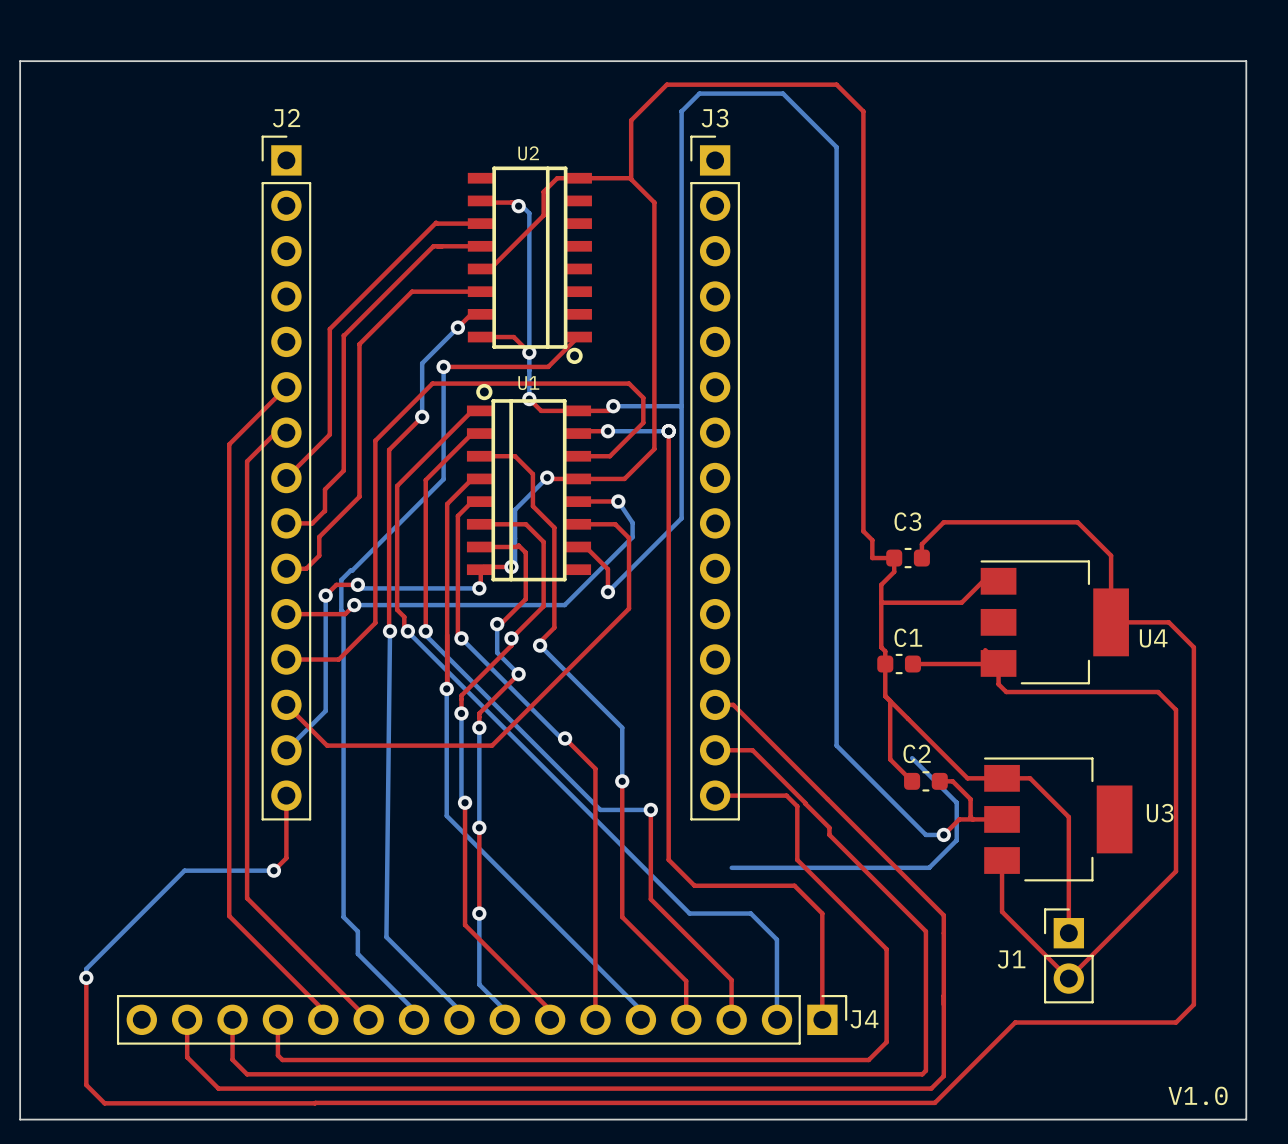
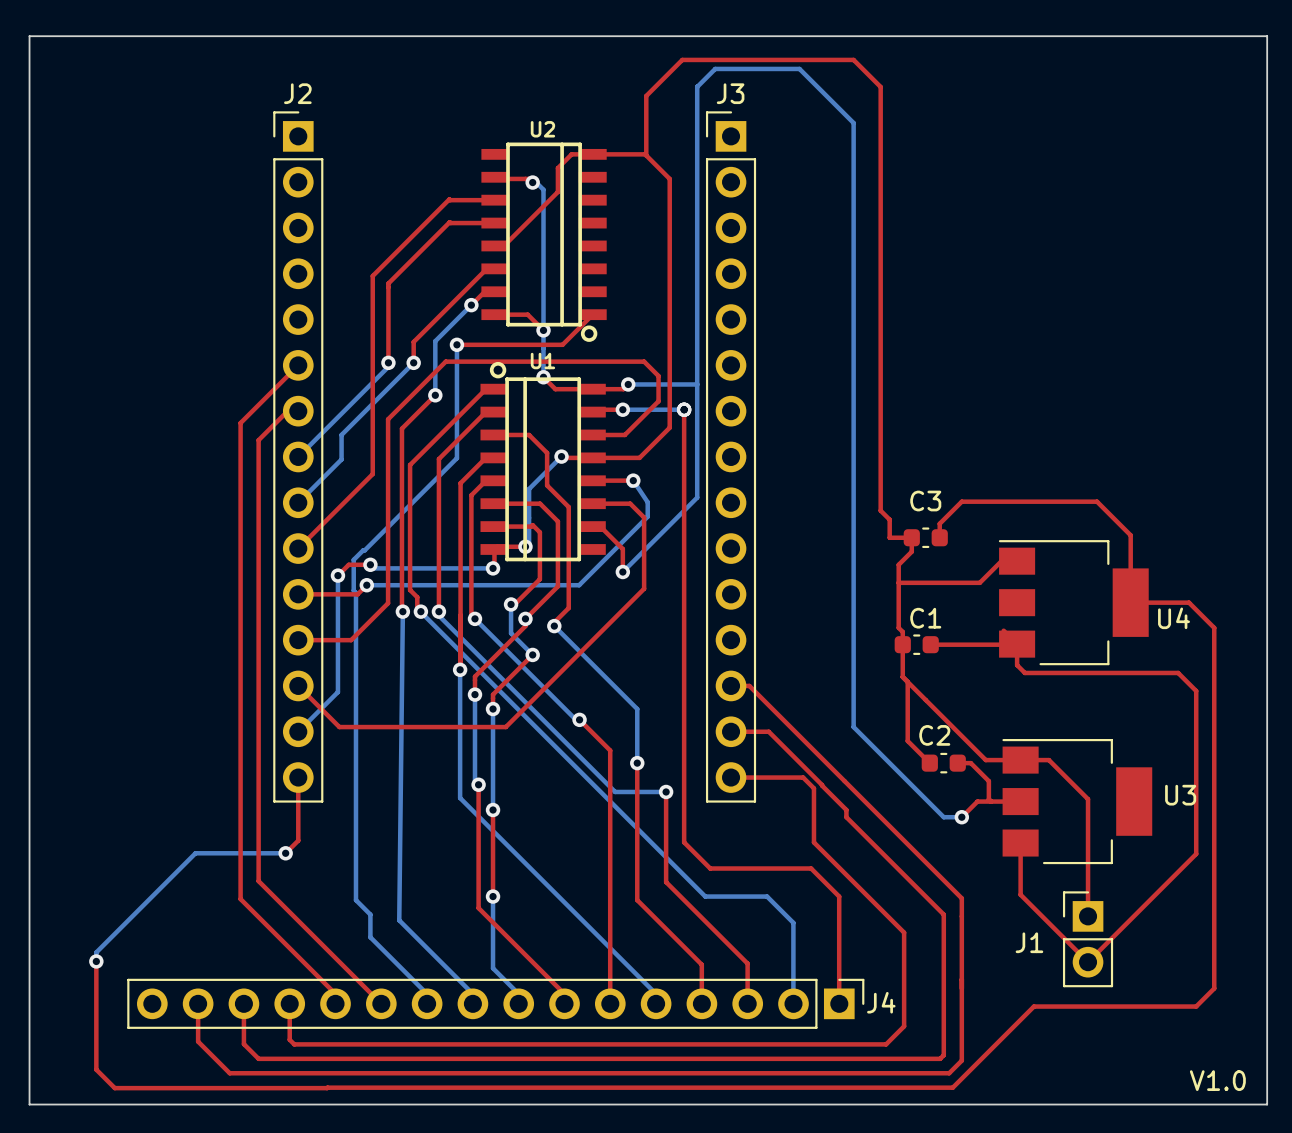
top track: (437, 246) (433, 246) (343, 335) (343, 470) (324, 489) (324, 511) -> (450, 223) (388, 283) (388, 366)
top track: (473, 291) (412, 291) (359, 344) (359, 496) (319, 536) (319, 555) (306, 568) (286, 568) -> (486, 268) (413, 341) (413, 362)
top track: (360, 298) (329, 329) (329, 434) (286, 478) -> (372, 275) (372, 474) (298, 548)
bottom track: none -> (388, 362) (388, 366) (298, 456)
via: none -> (388, 362)
bottom track: none -> (413, 362) (341, 434) (341, 459) (298, 502)
via: none -> (413, 362)
top track: (324, 511) (312, 523) (286, 523) -> none
bottom track: (912, 758) (956, 802) (956, 840) (929, 867) (731, 867) -> none

